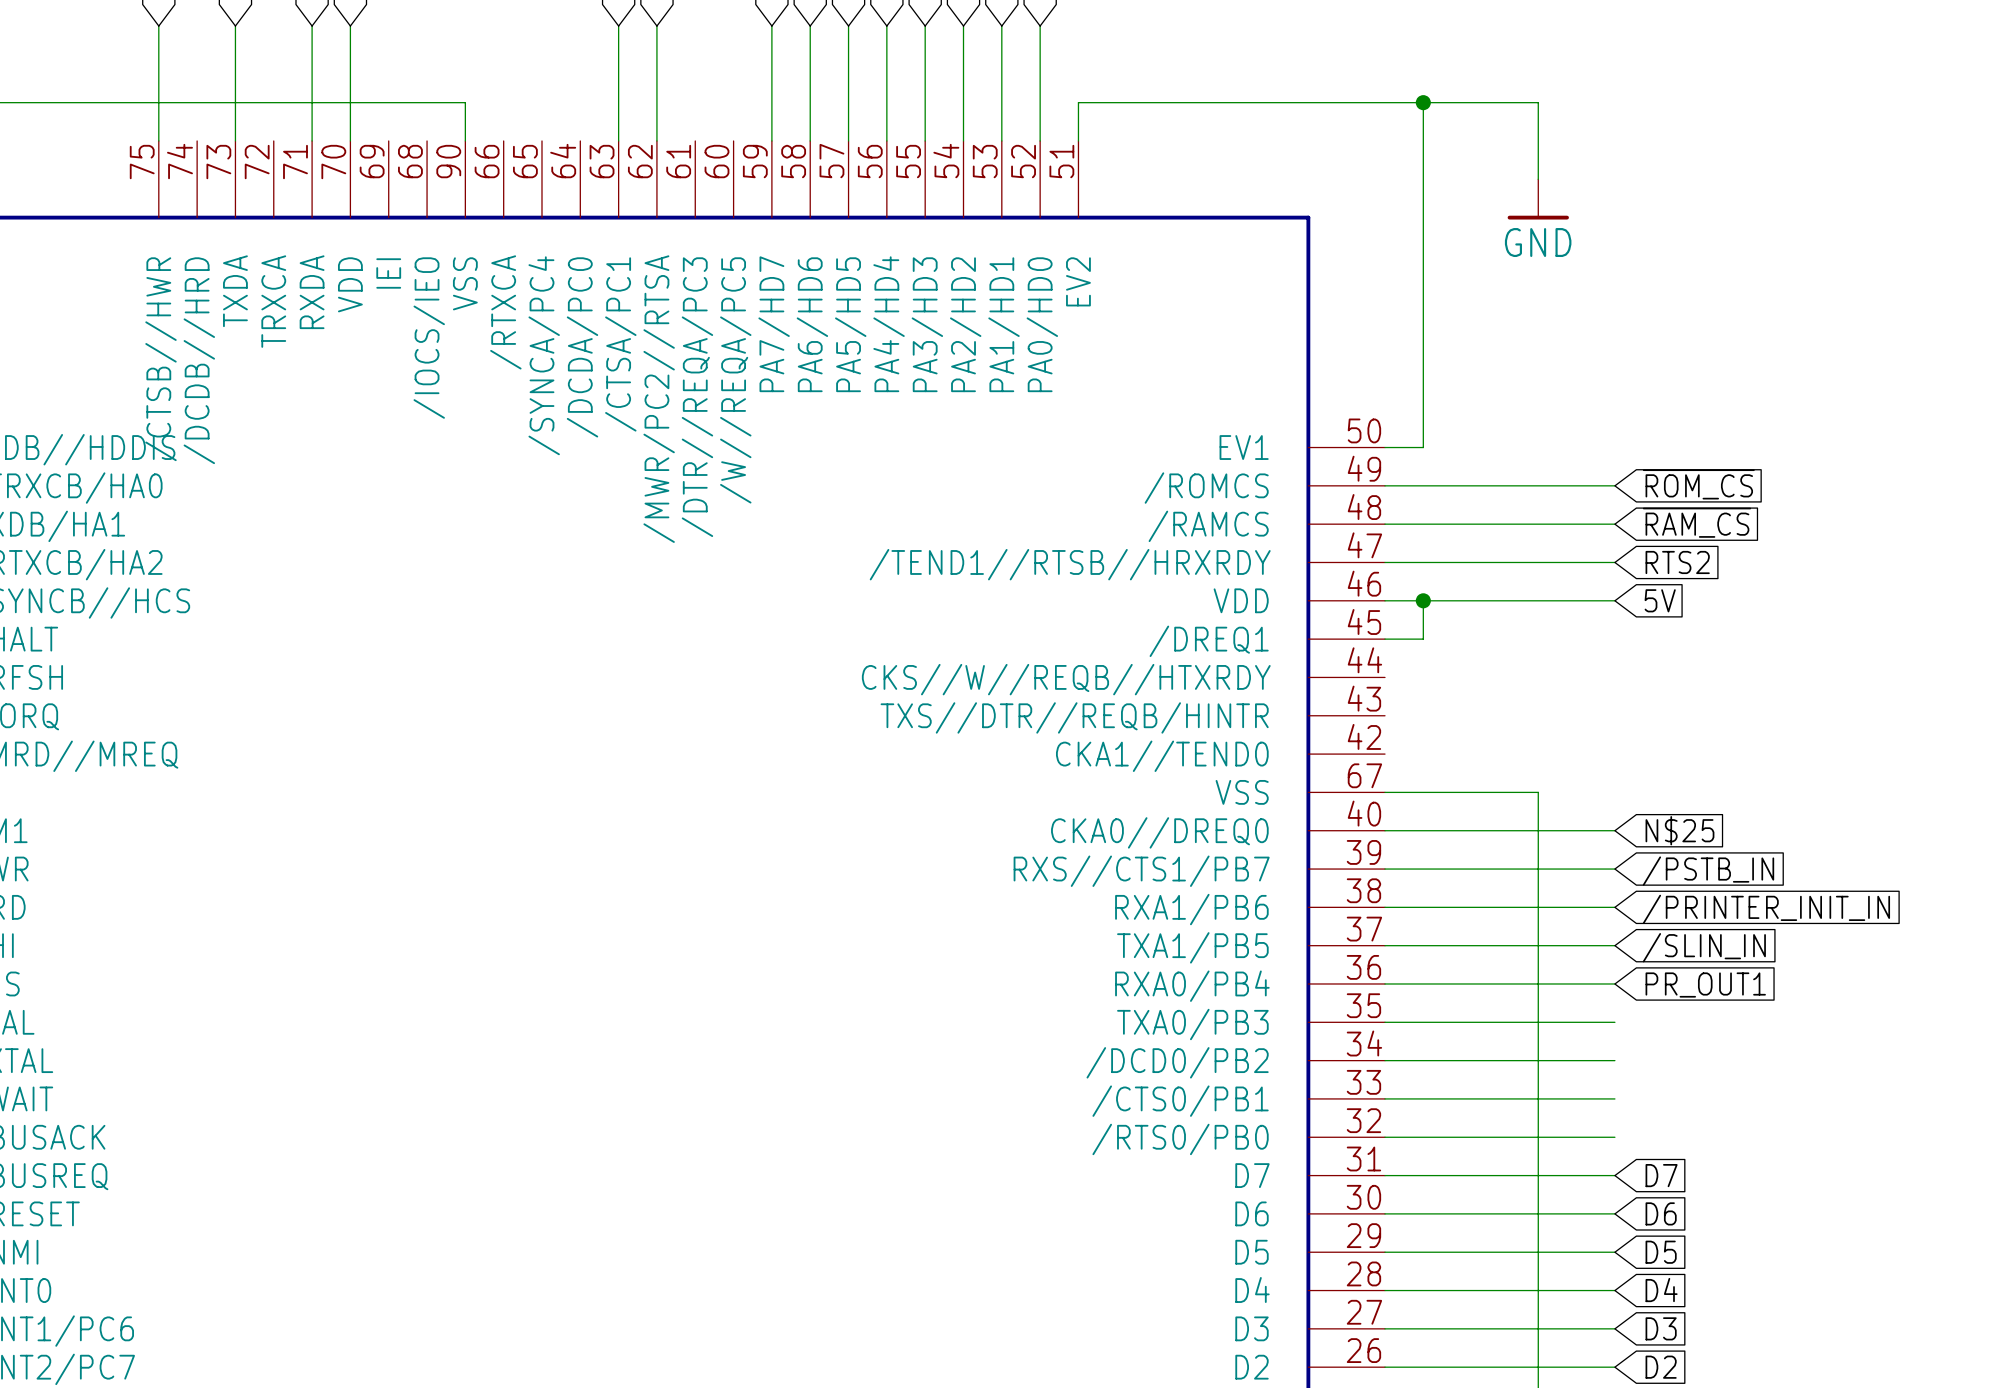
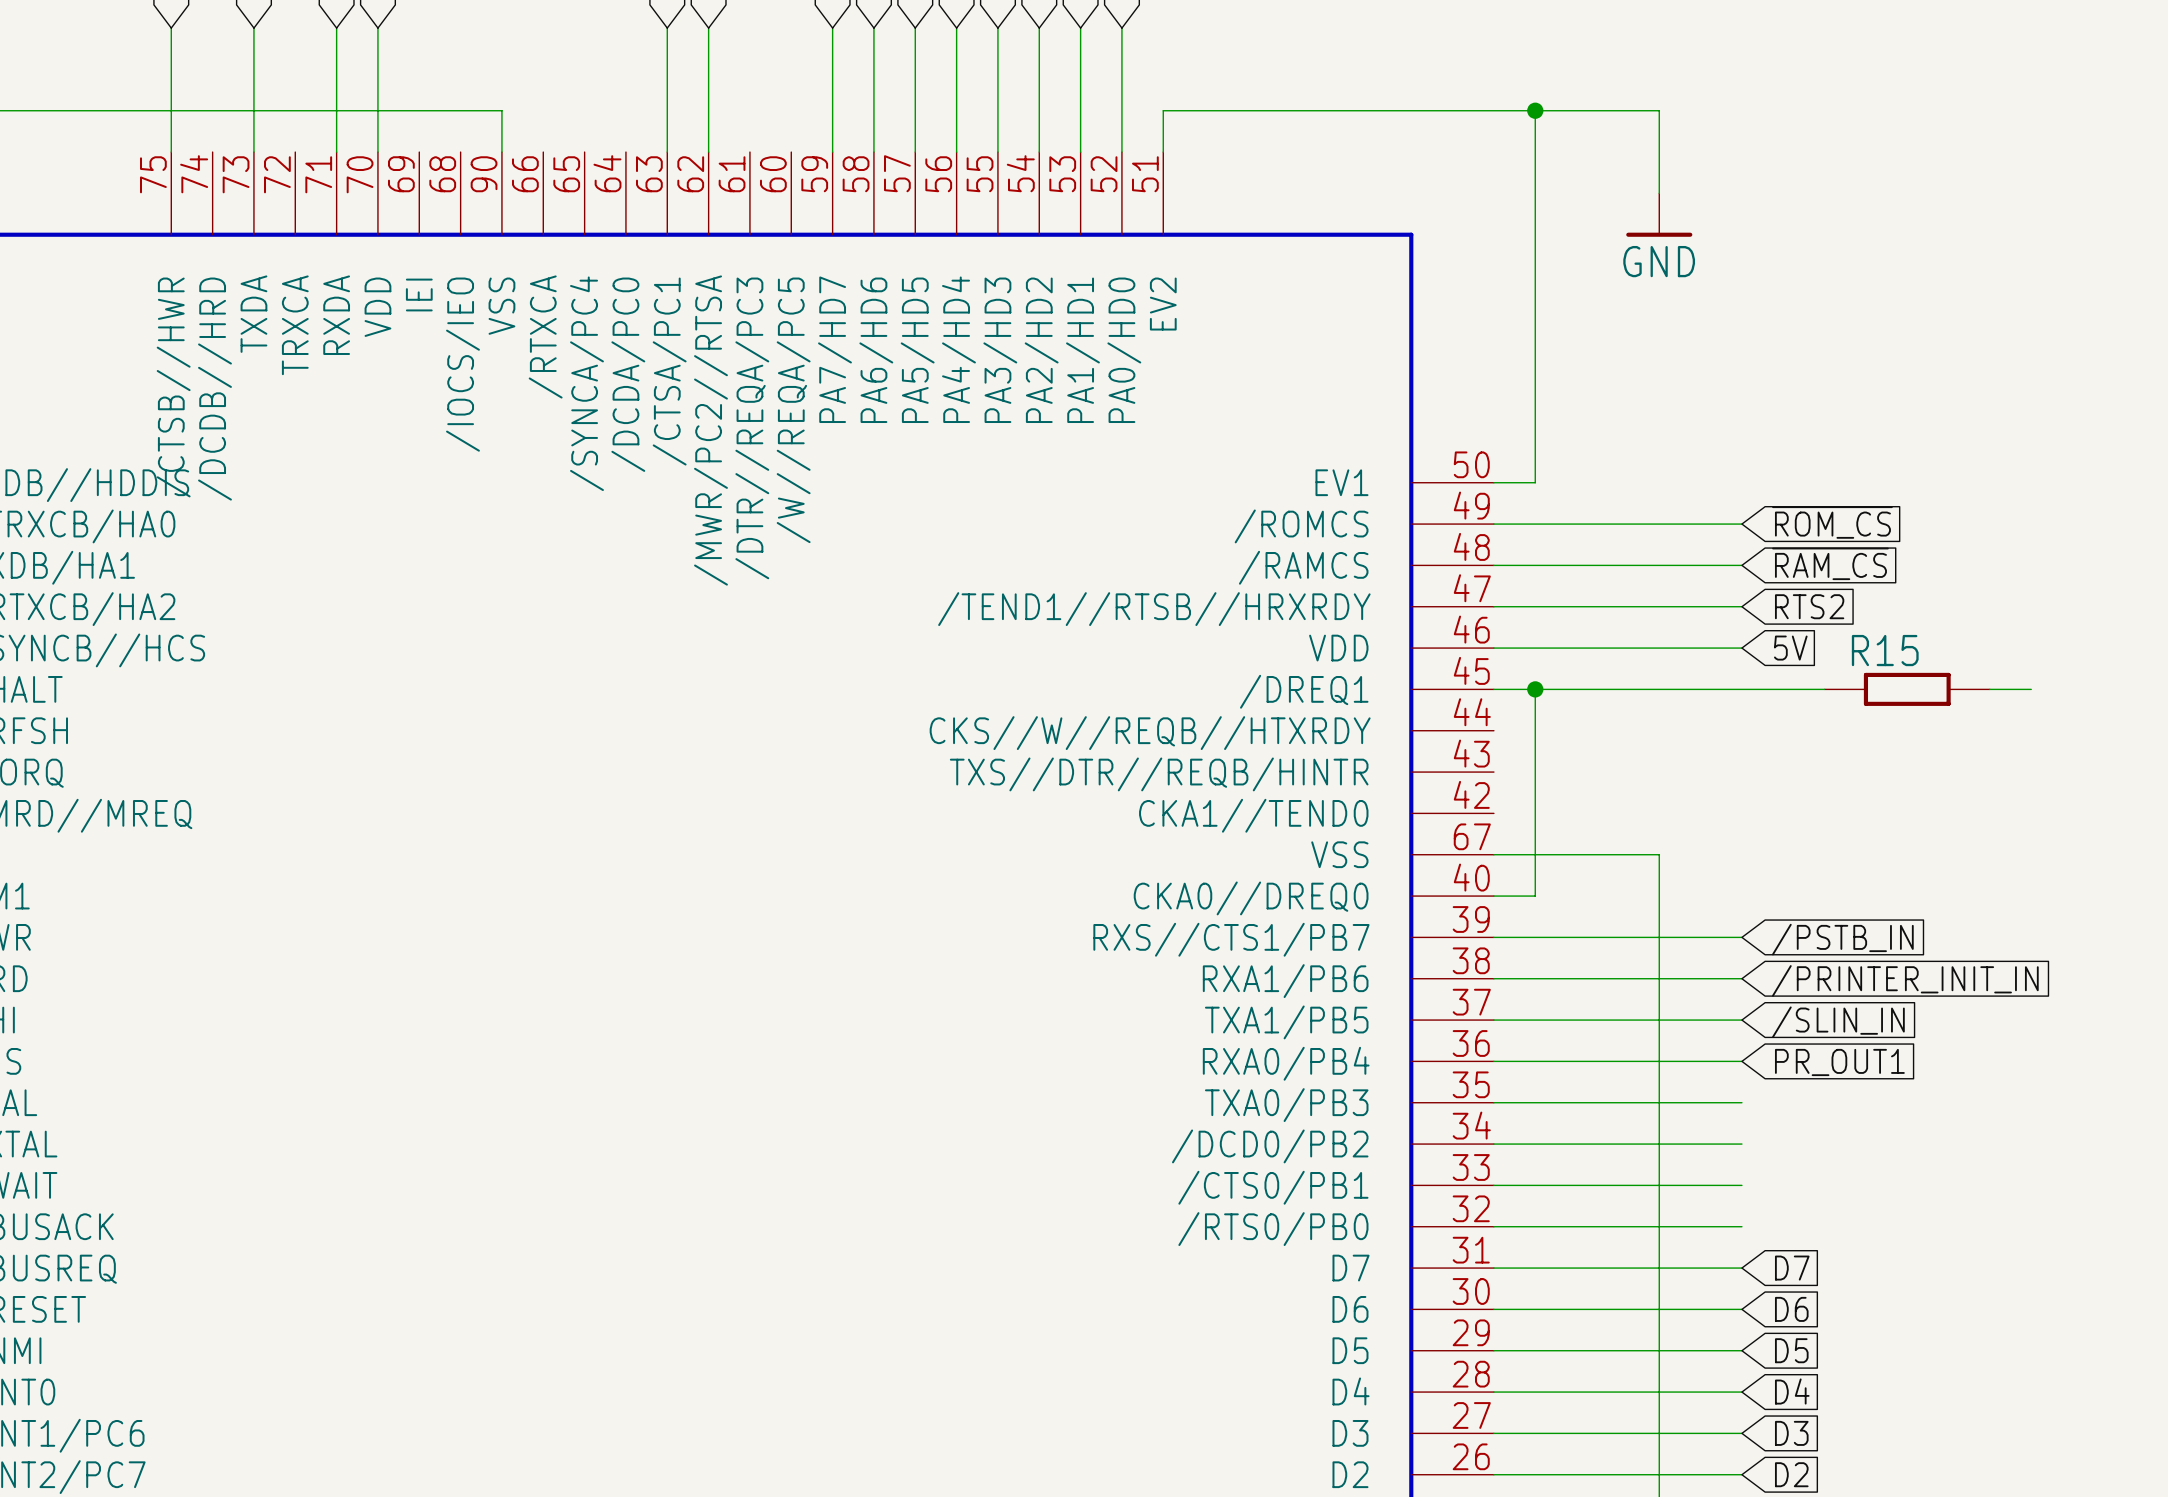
wire: (1423, 600) (1423, 639) -> none
junction position: (1423, 600) -> (1535, 689)
R15: none -> (1907, 689)
wire: none -> (1989, 689) (2031, 689)
wire: (1423, 830) (1614, 830) -> (1535, 896) (1535, 689) (1824, 689)
global label: N$25 (1679, 830) -> none

